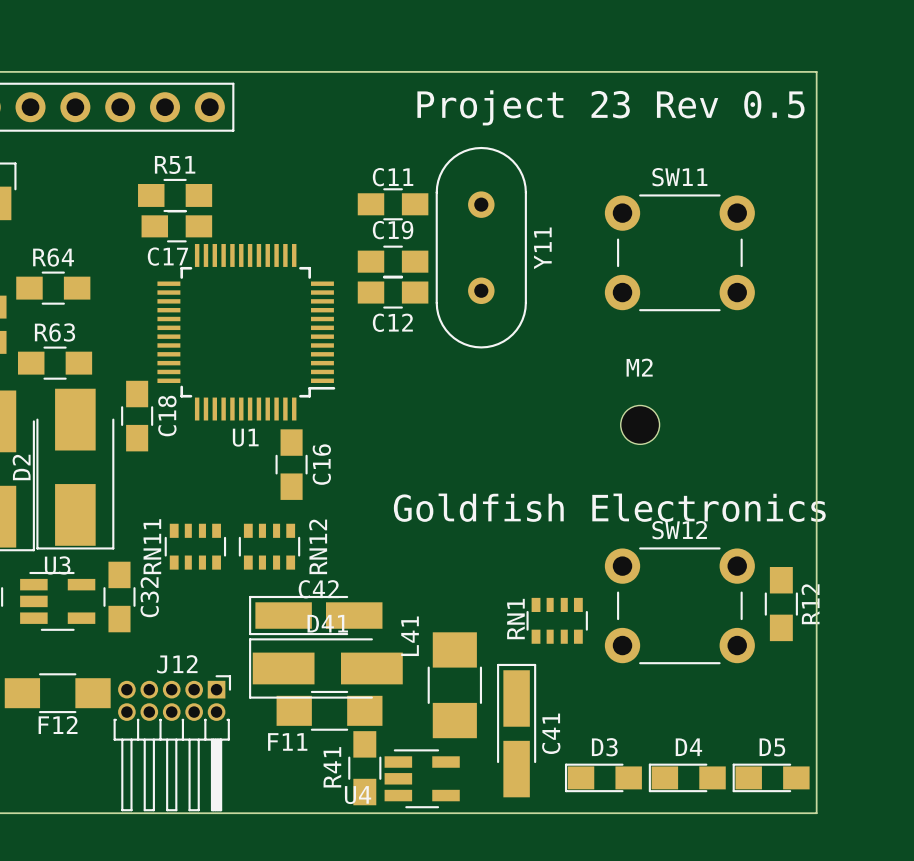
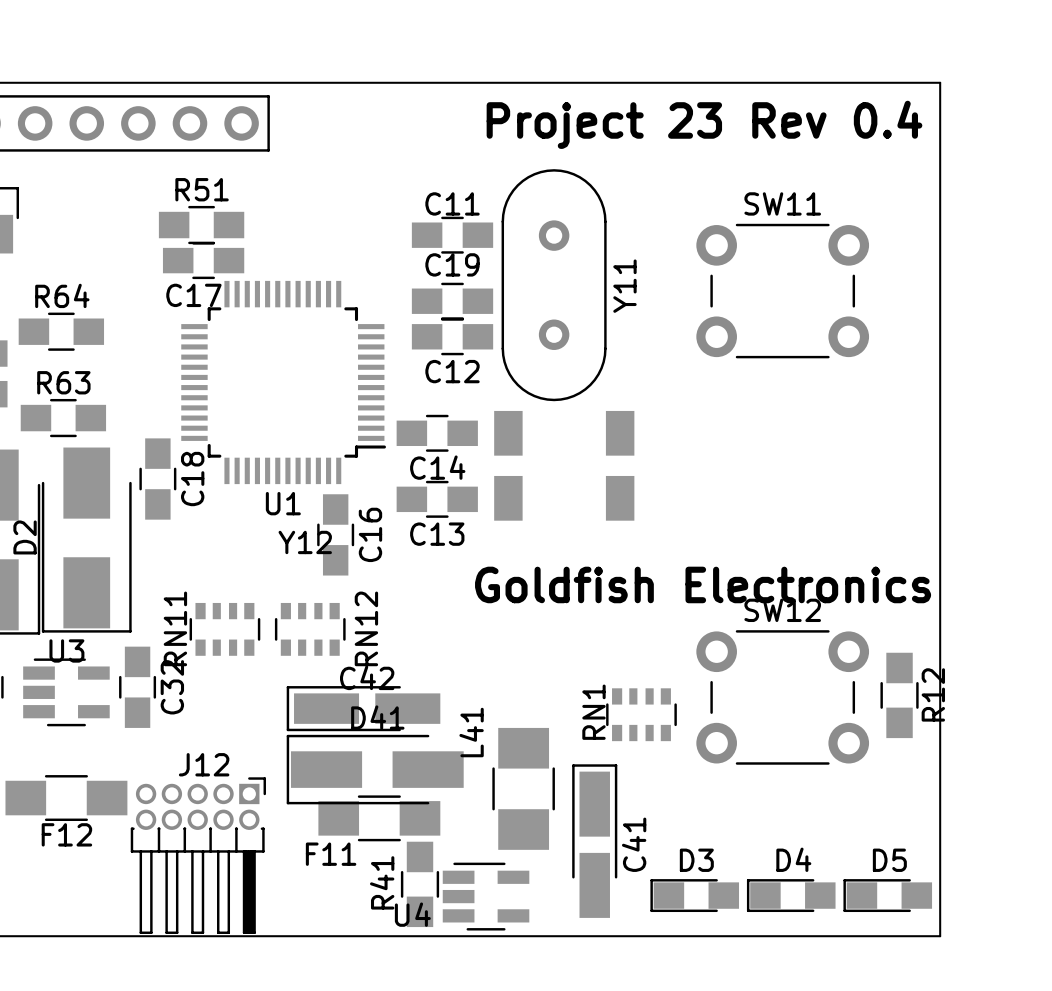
text: Project 23 Rev 0.5 (610, 107) -> Project 23 Rev 0.4 (704, 124)
C14: none -> (437, 433)
Y12: none -> (564, 465)
M2: (640, 424) -> none
C13: none -> (437, 499)

